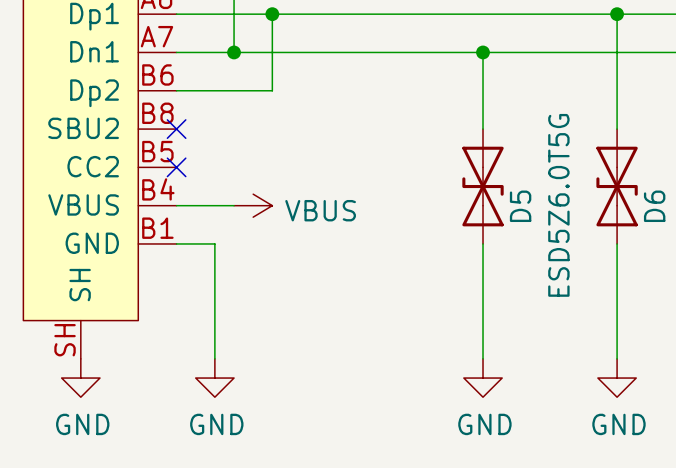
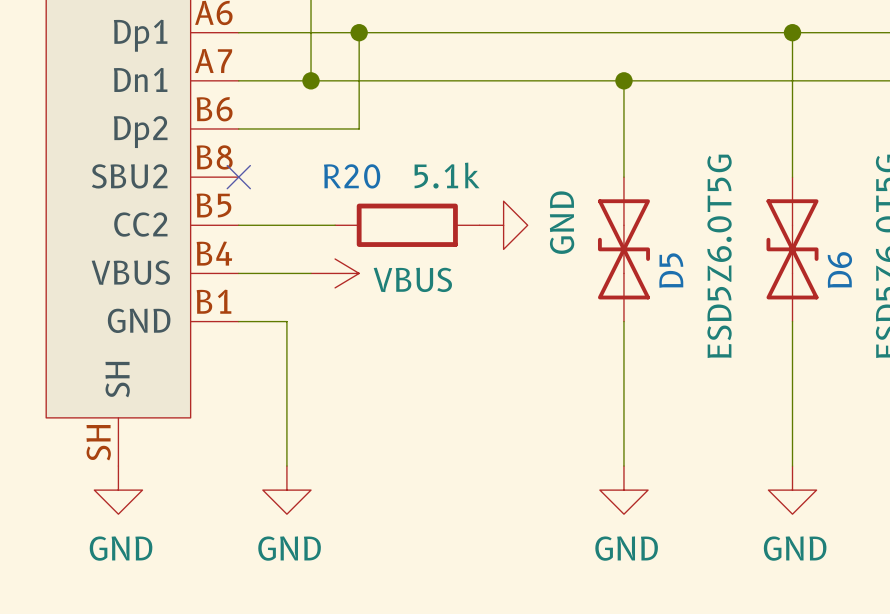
wire: none -> (238, 225) (335, 225)
no-connect mark: (176, 167) -> none
R20: none -> 5.1k (407, 225)
power symbol: none -> GND (503, 225)

